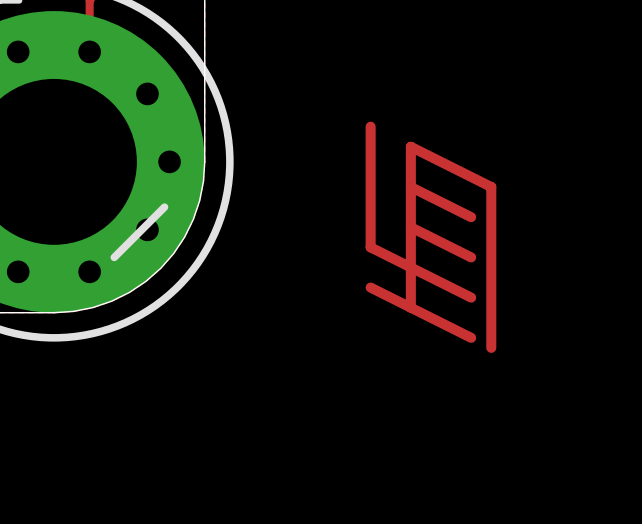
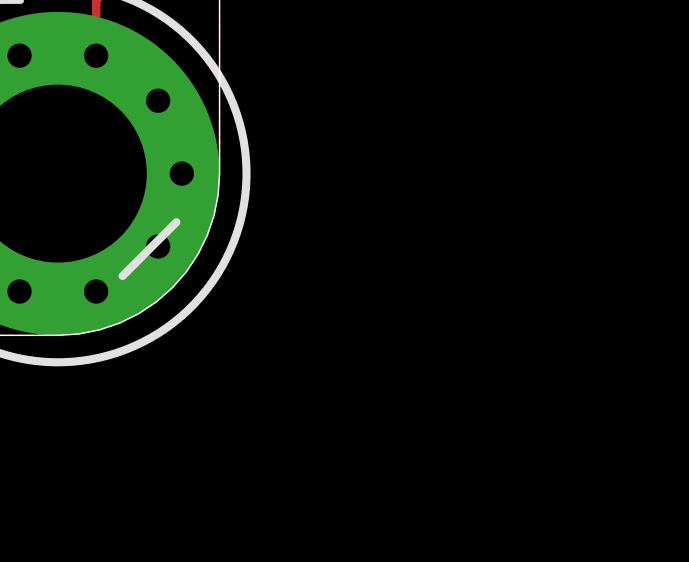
drawing: [365, 121, 497, 353] -> none

